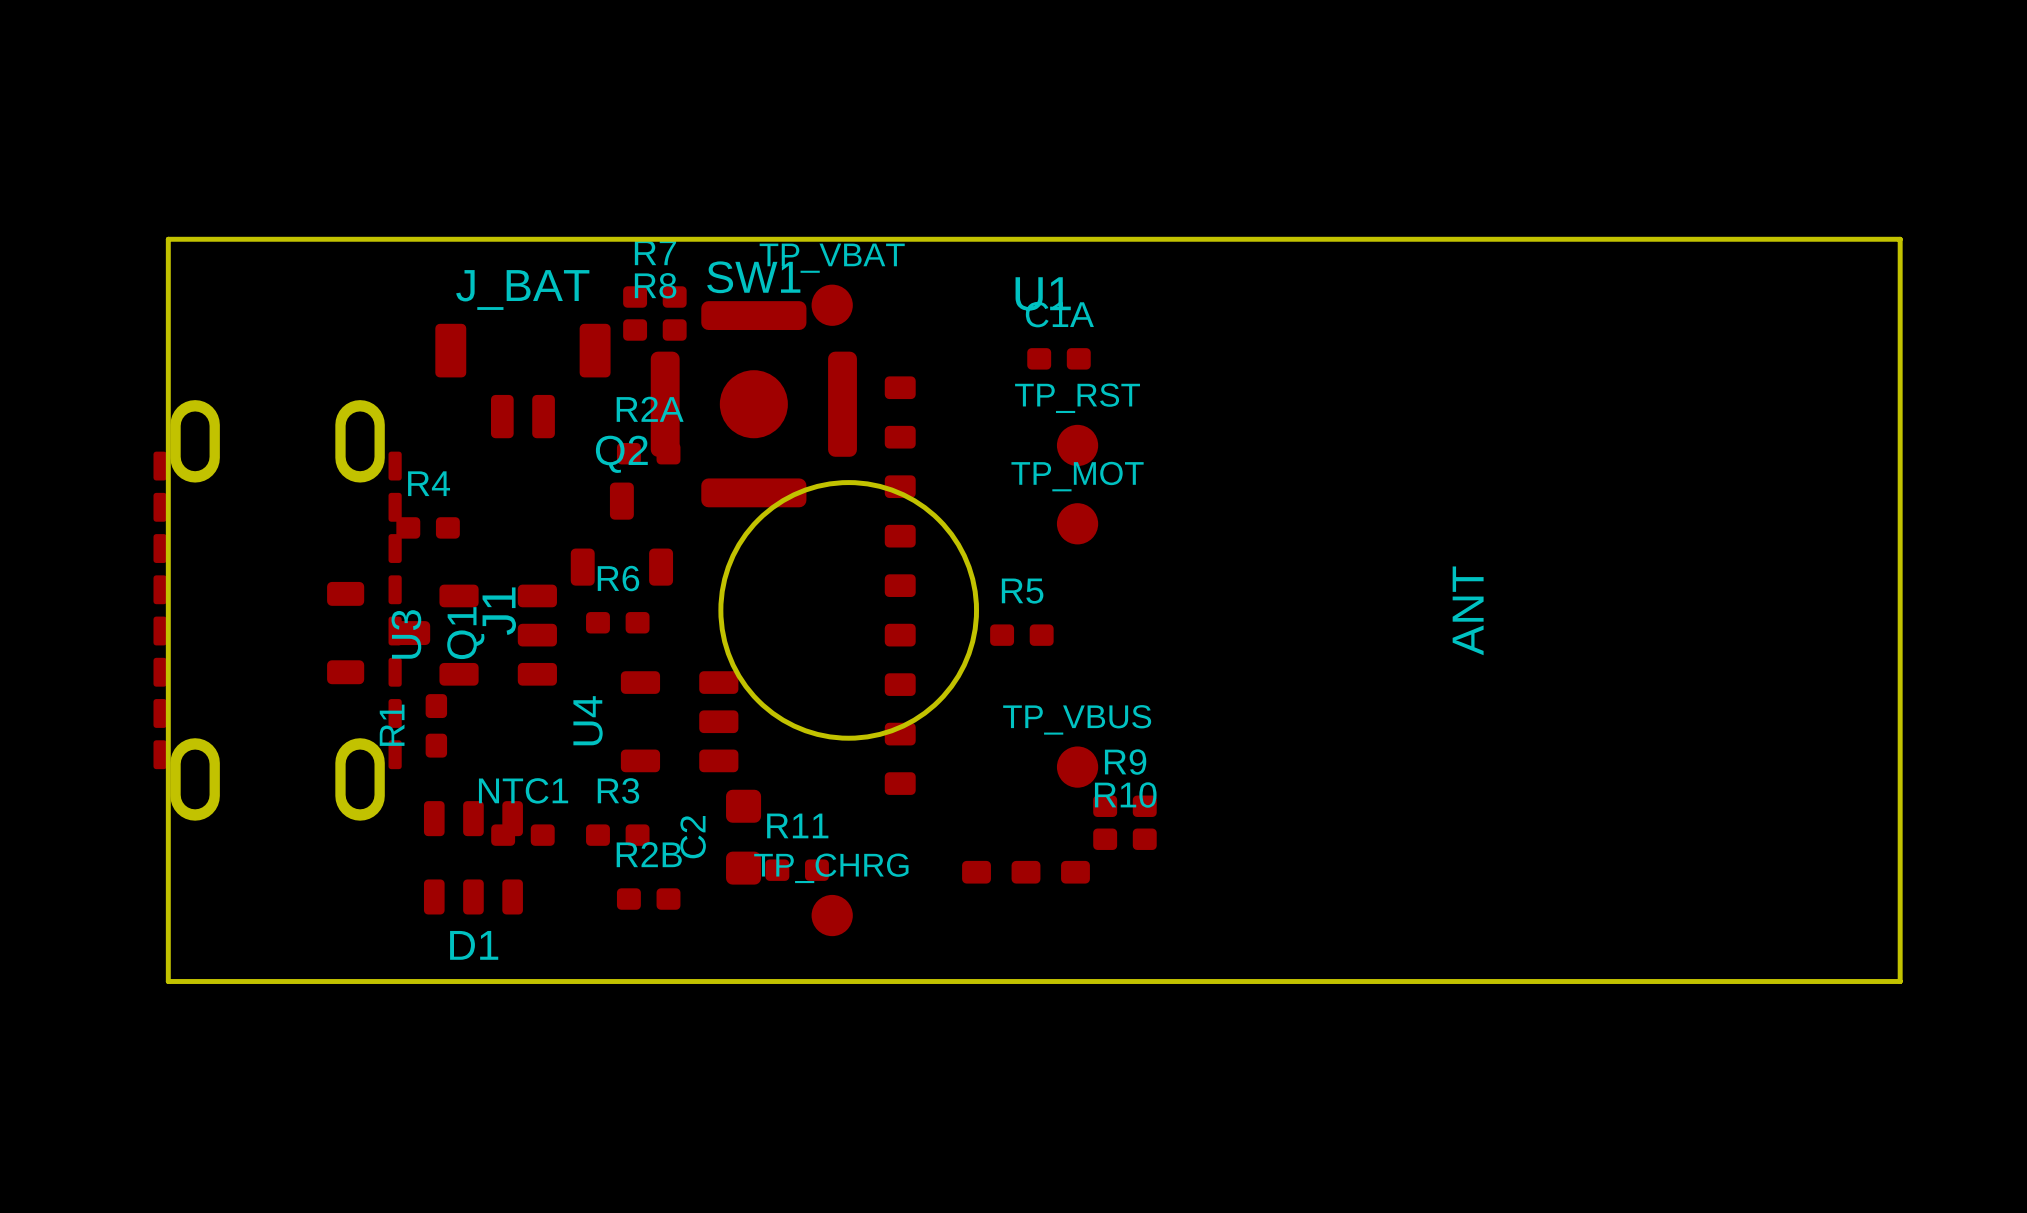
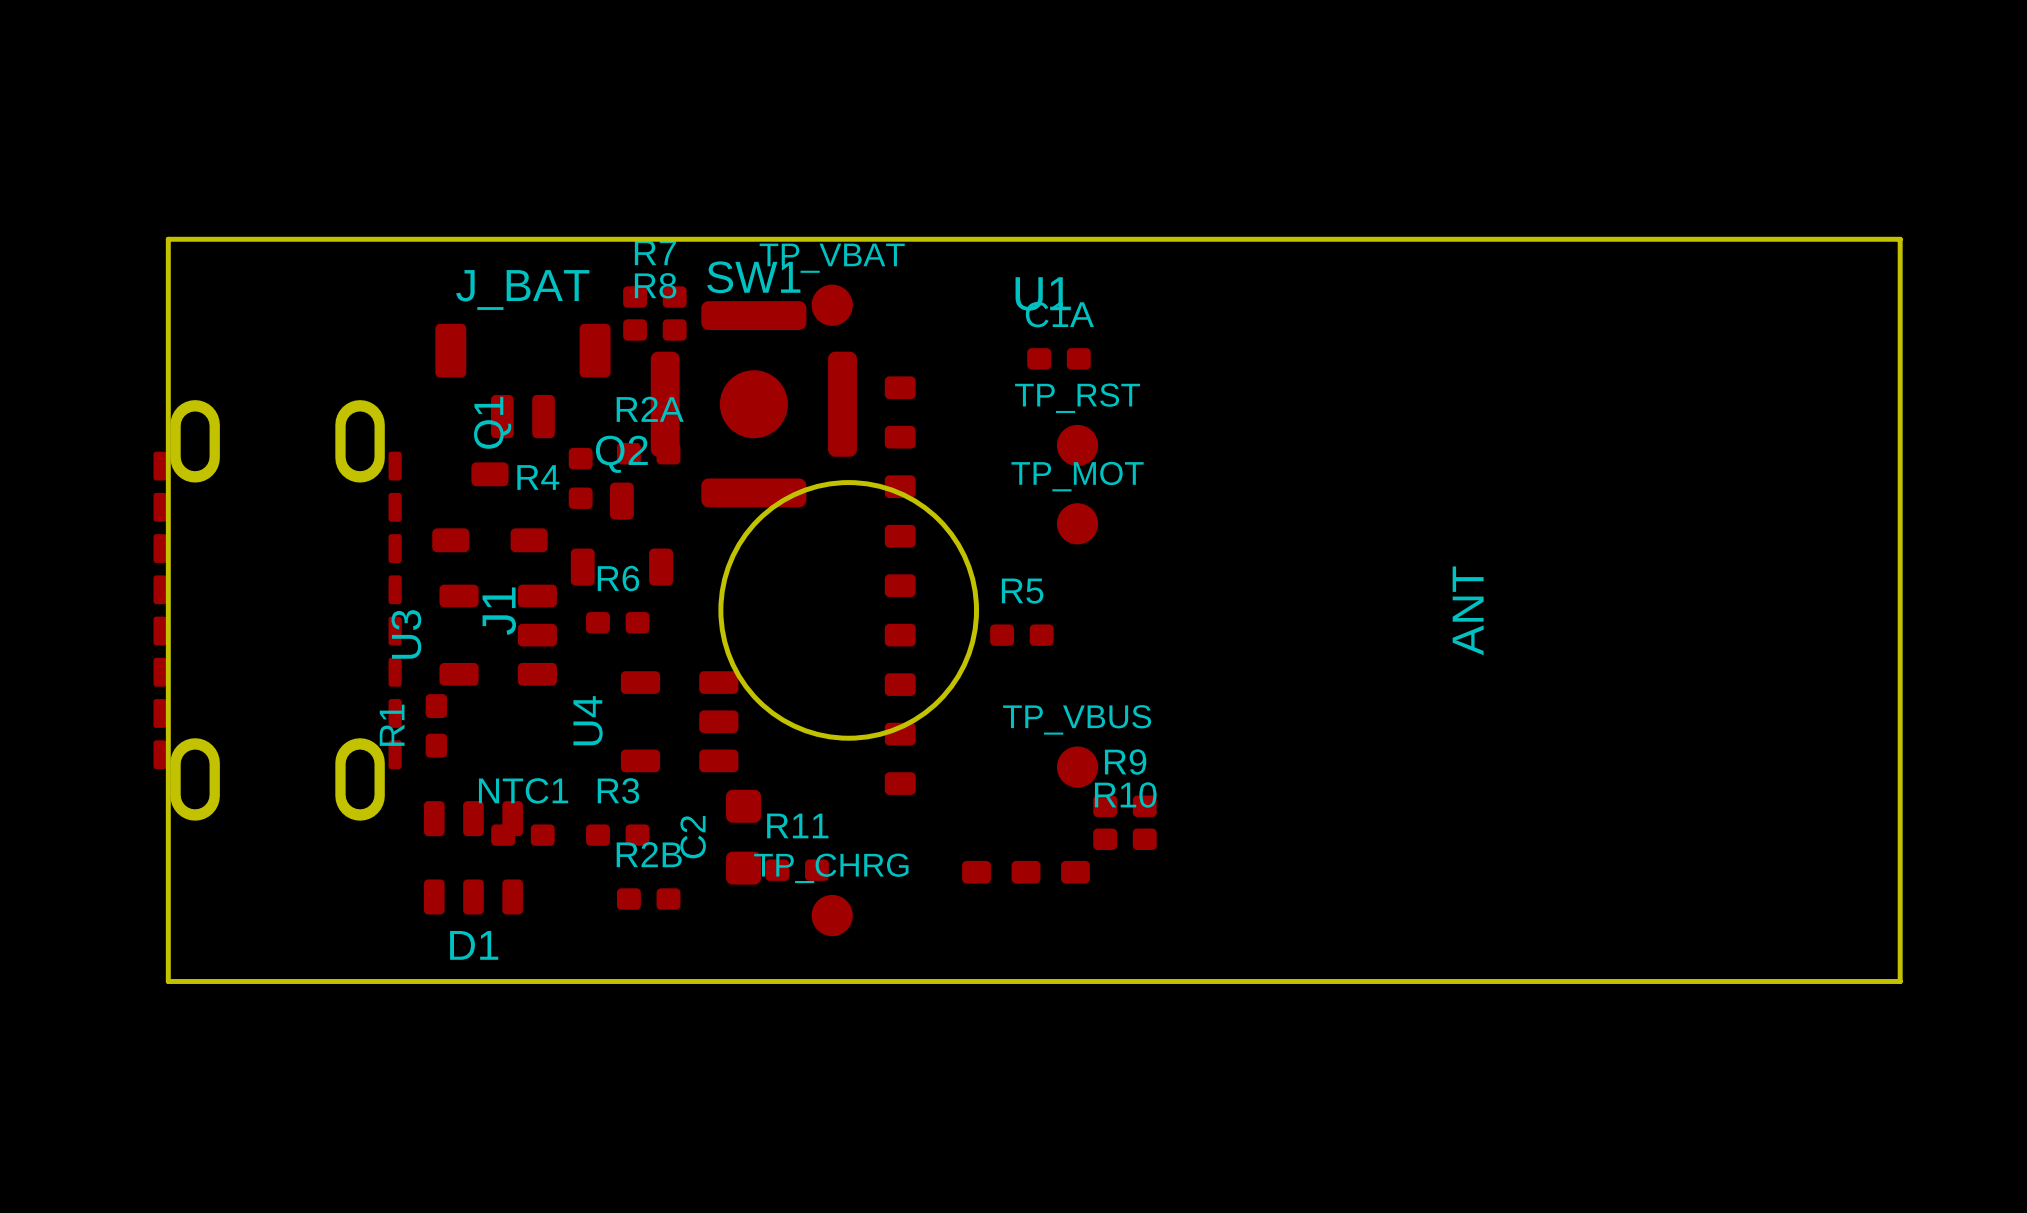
R4 footprint: [396, 517, 460, 539] -> [568, 447, 593, 509]
Q1 footprint: [327, 581, 431, 685] -> [432, 462, 548, 553]
Q1 name position: Q1 (465, 633) -> Q1 (492, 422)

